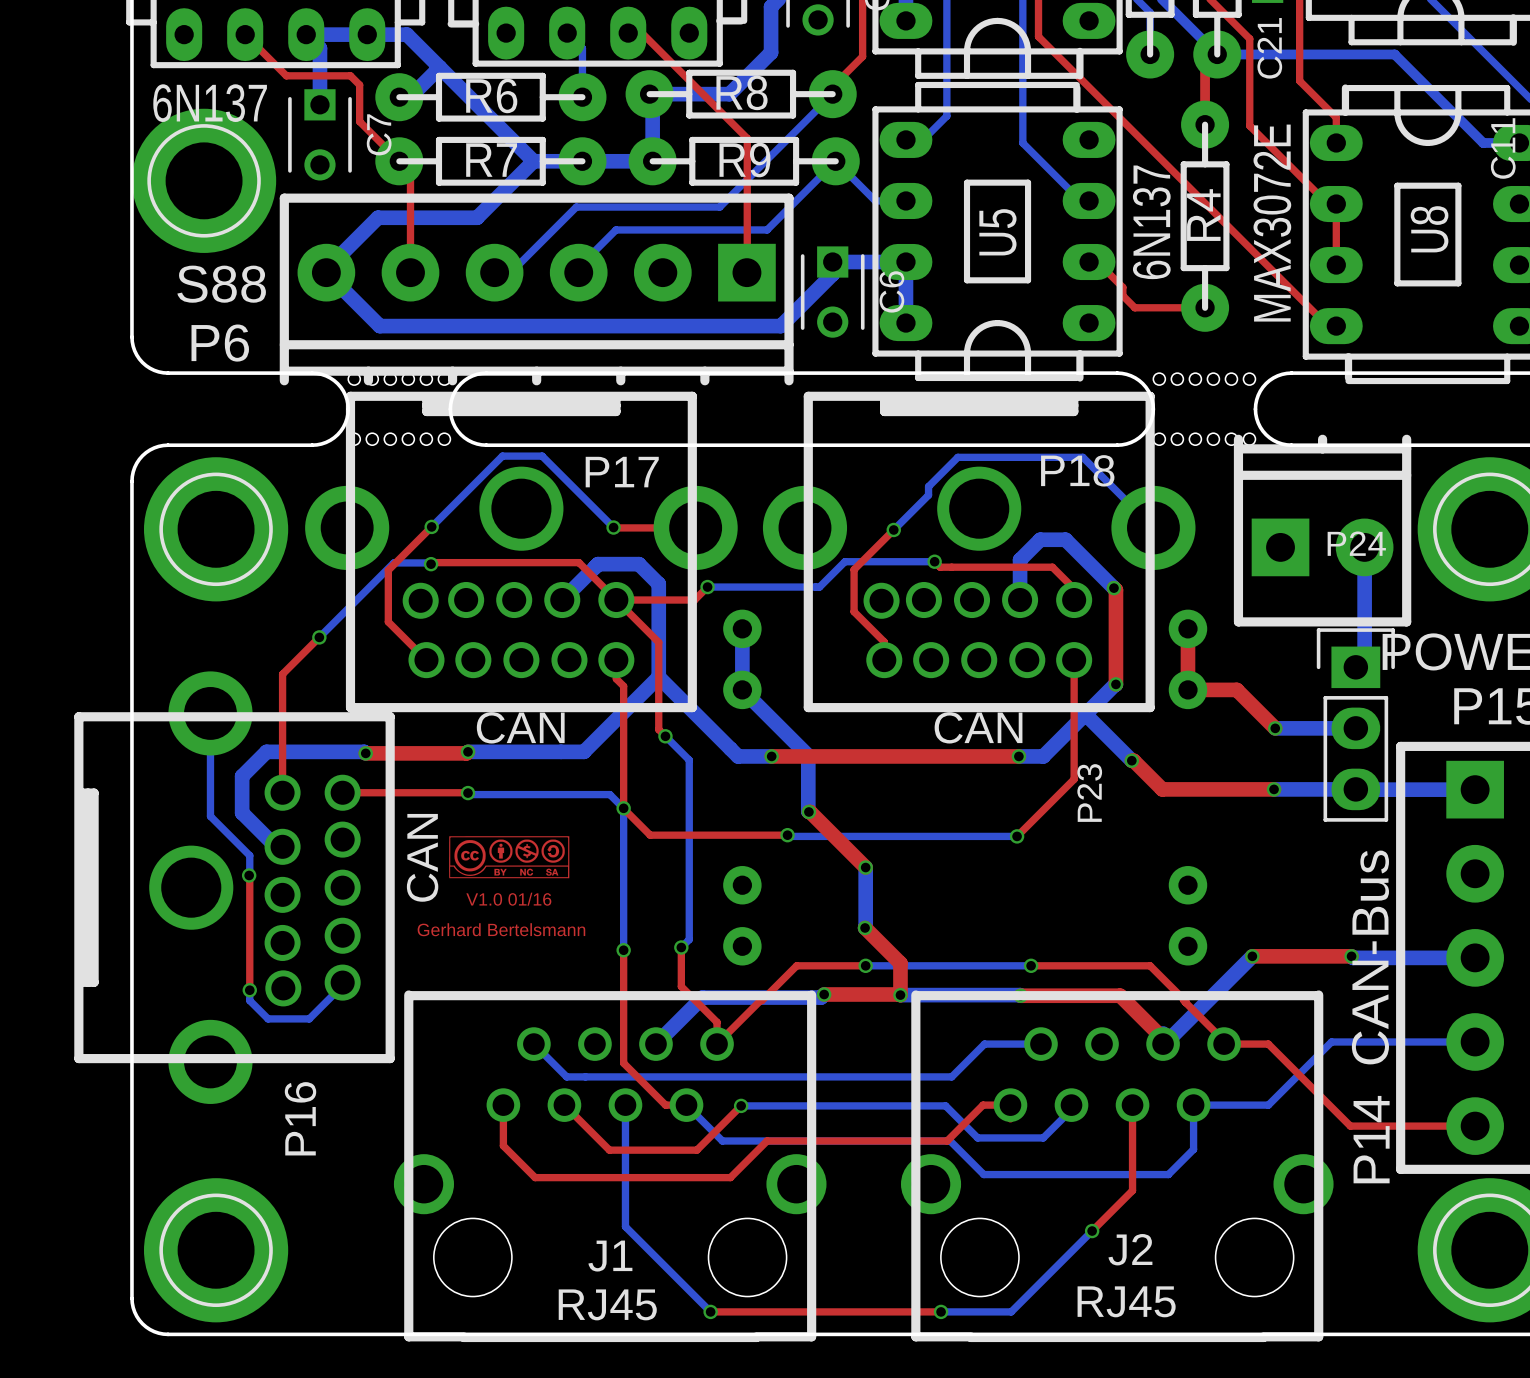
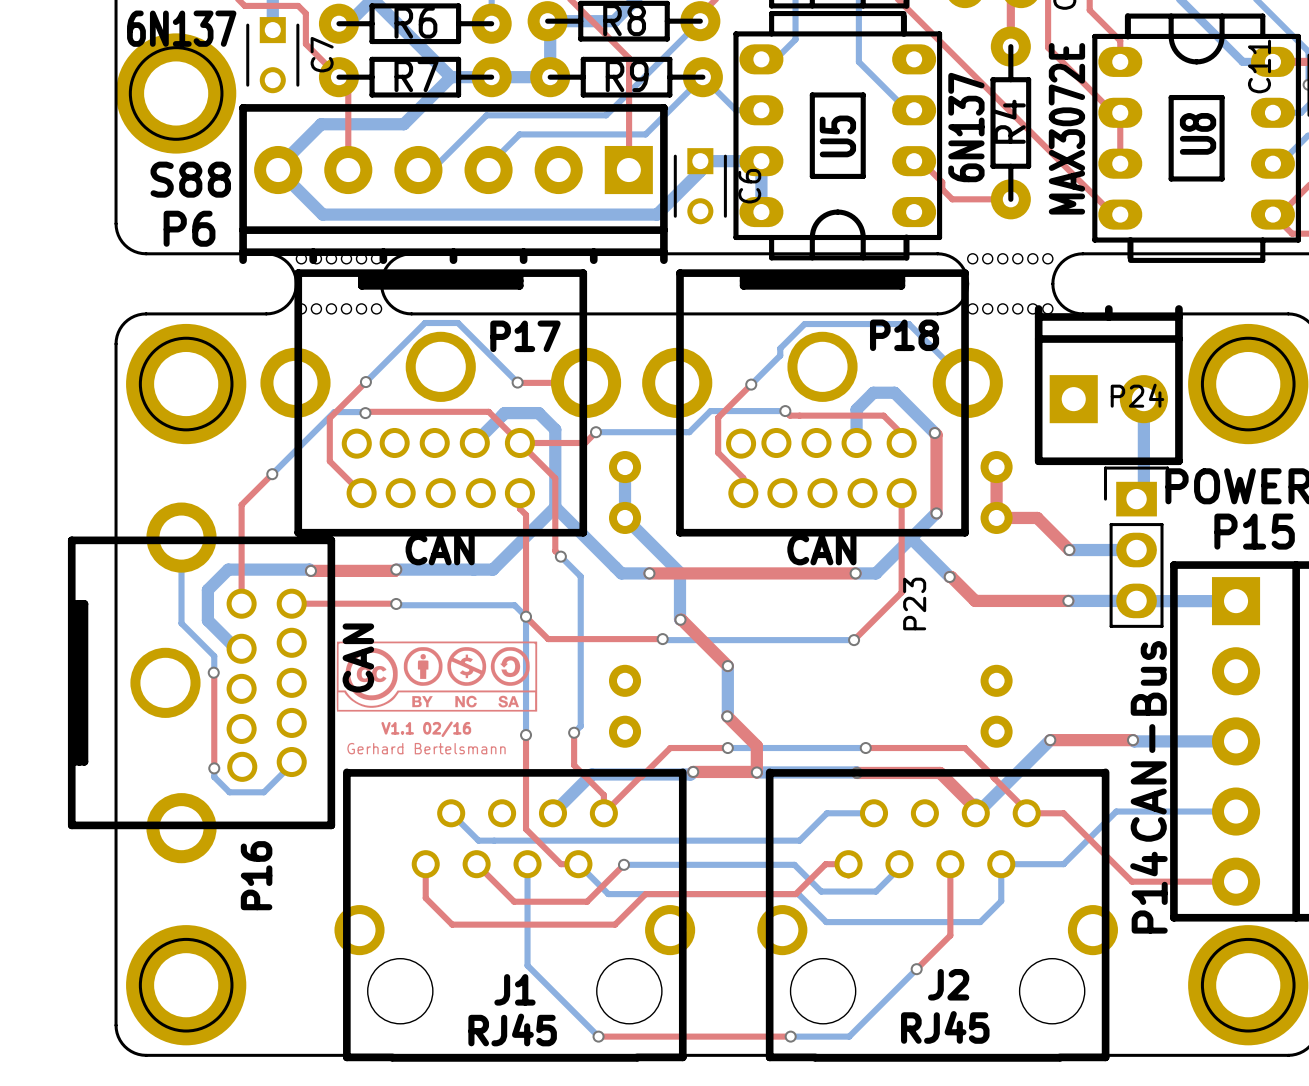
drawing: [449, 836, 570, 879] -> none
drawing: none -> [336, 641, 538, 712]
text: V1.0 01/16 (508, 899) -> none
text: Gerhard Bertelsmann (501, 929) -> V1.1 02/16 (426, 729)
text: none -> Gerhard Bertelsmann (426, 748)

